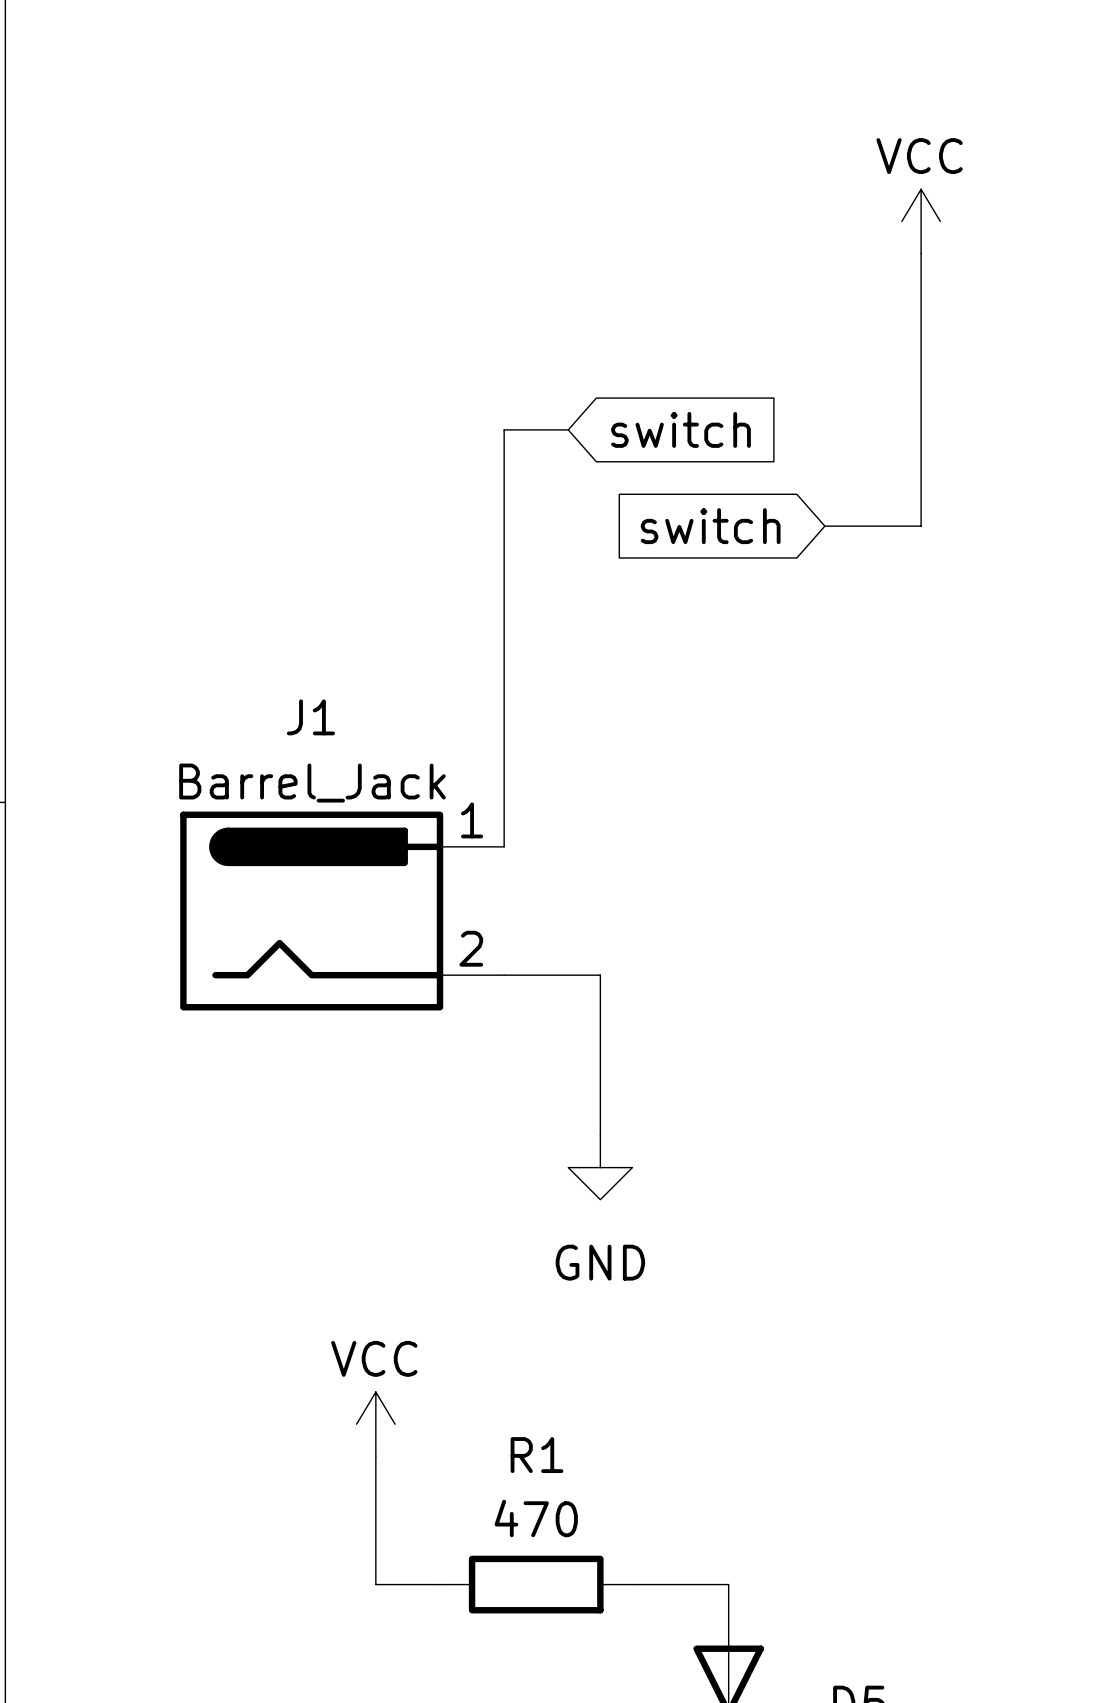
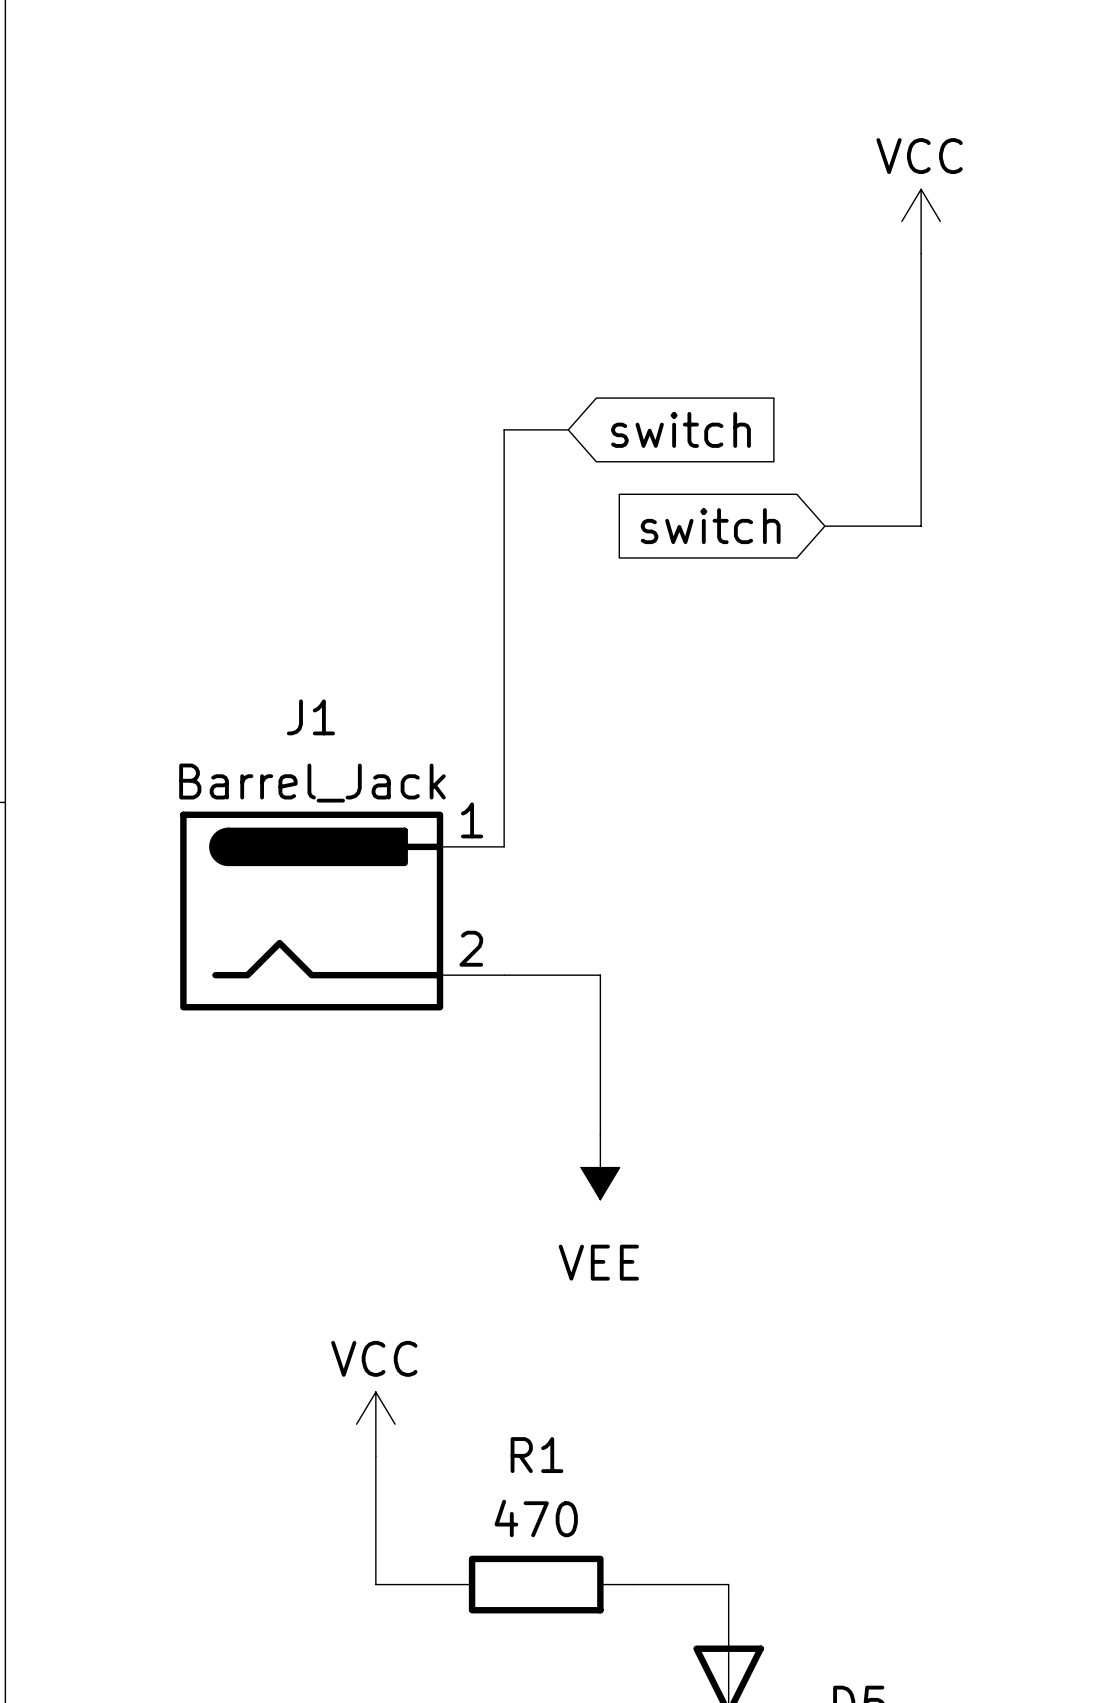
power symbol: GND (600, 1167) -> VEE (600, 1167)

